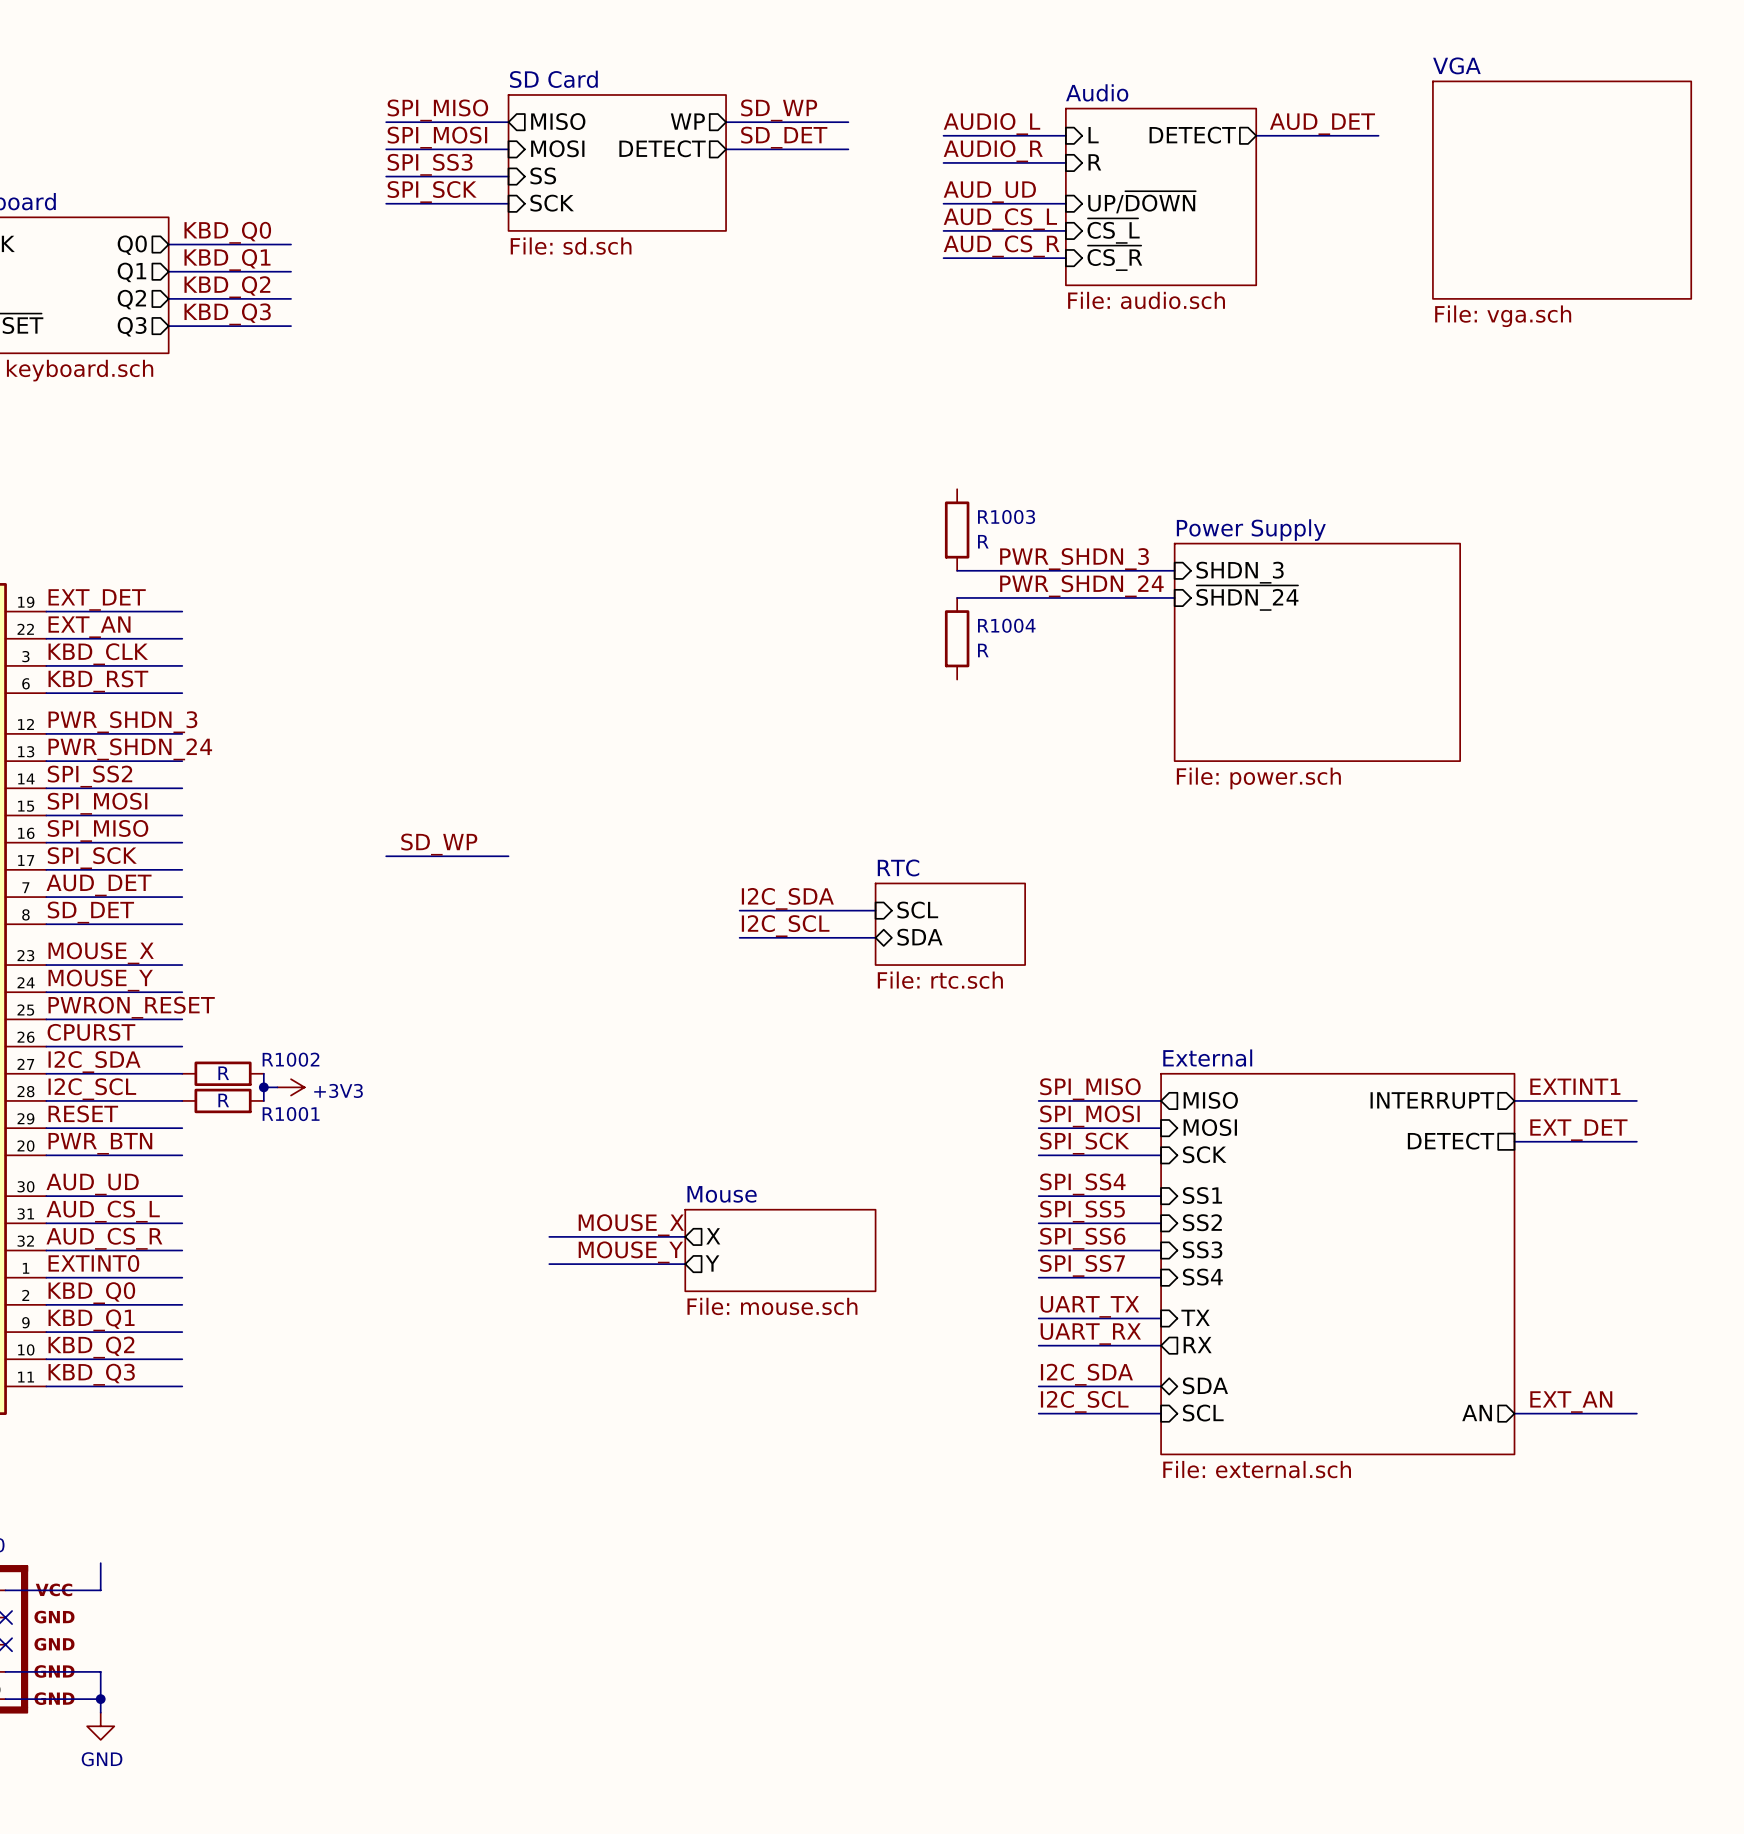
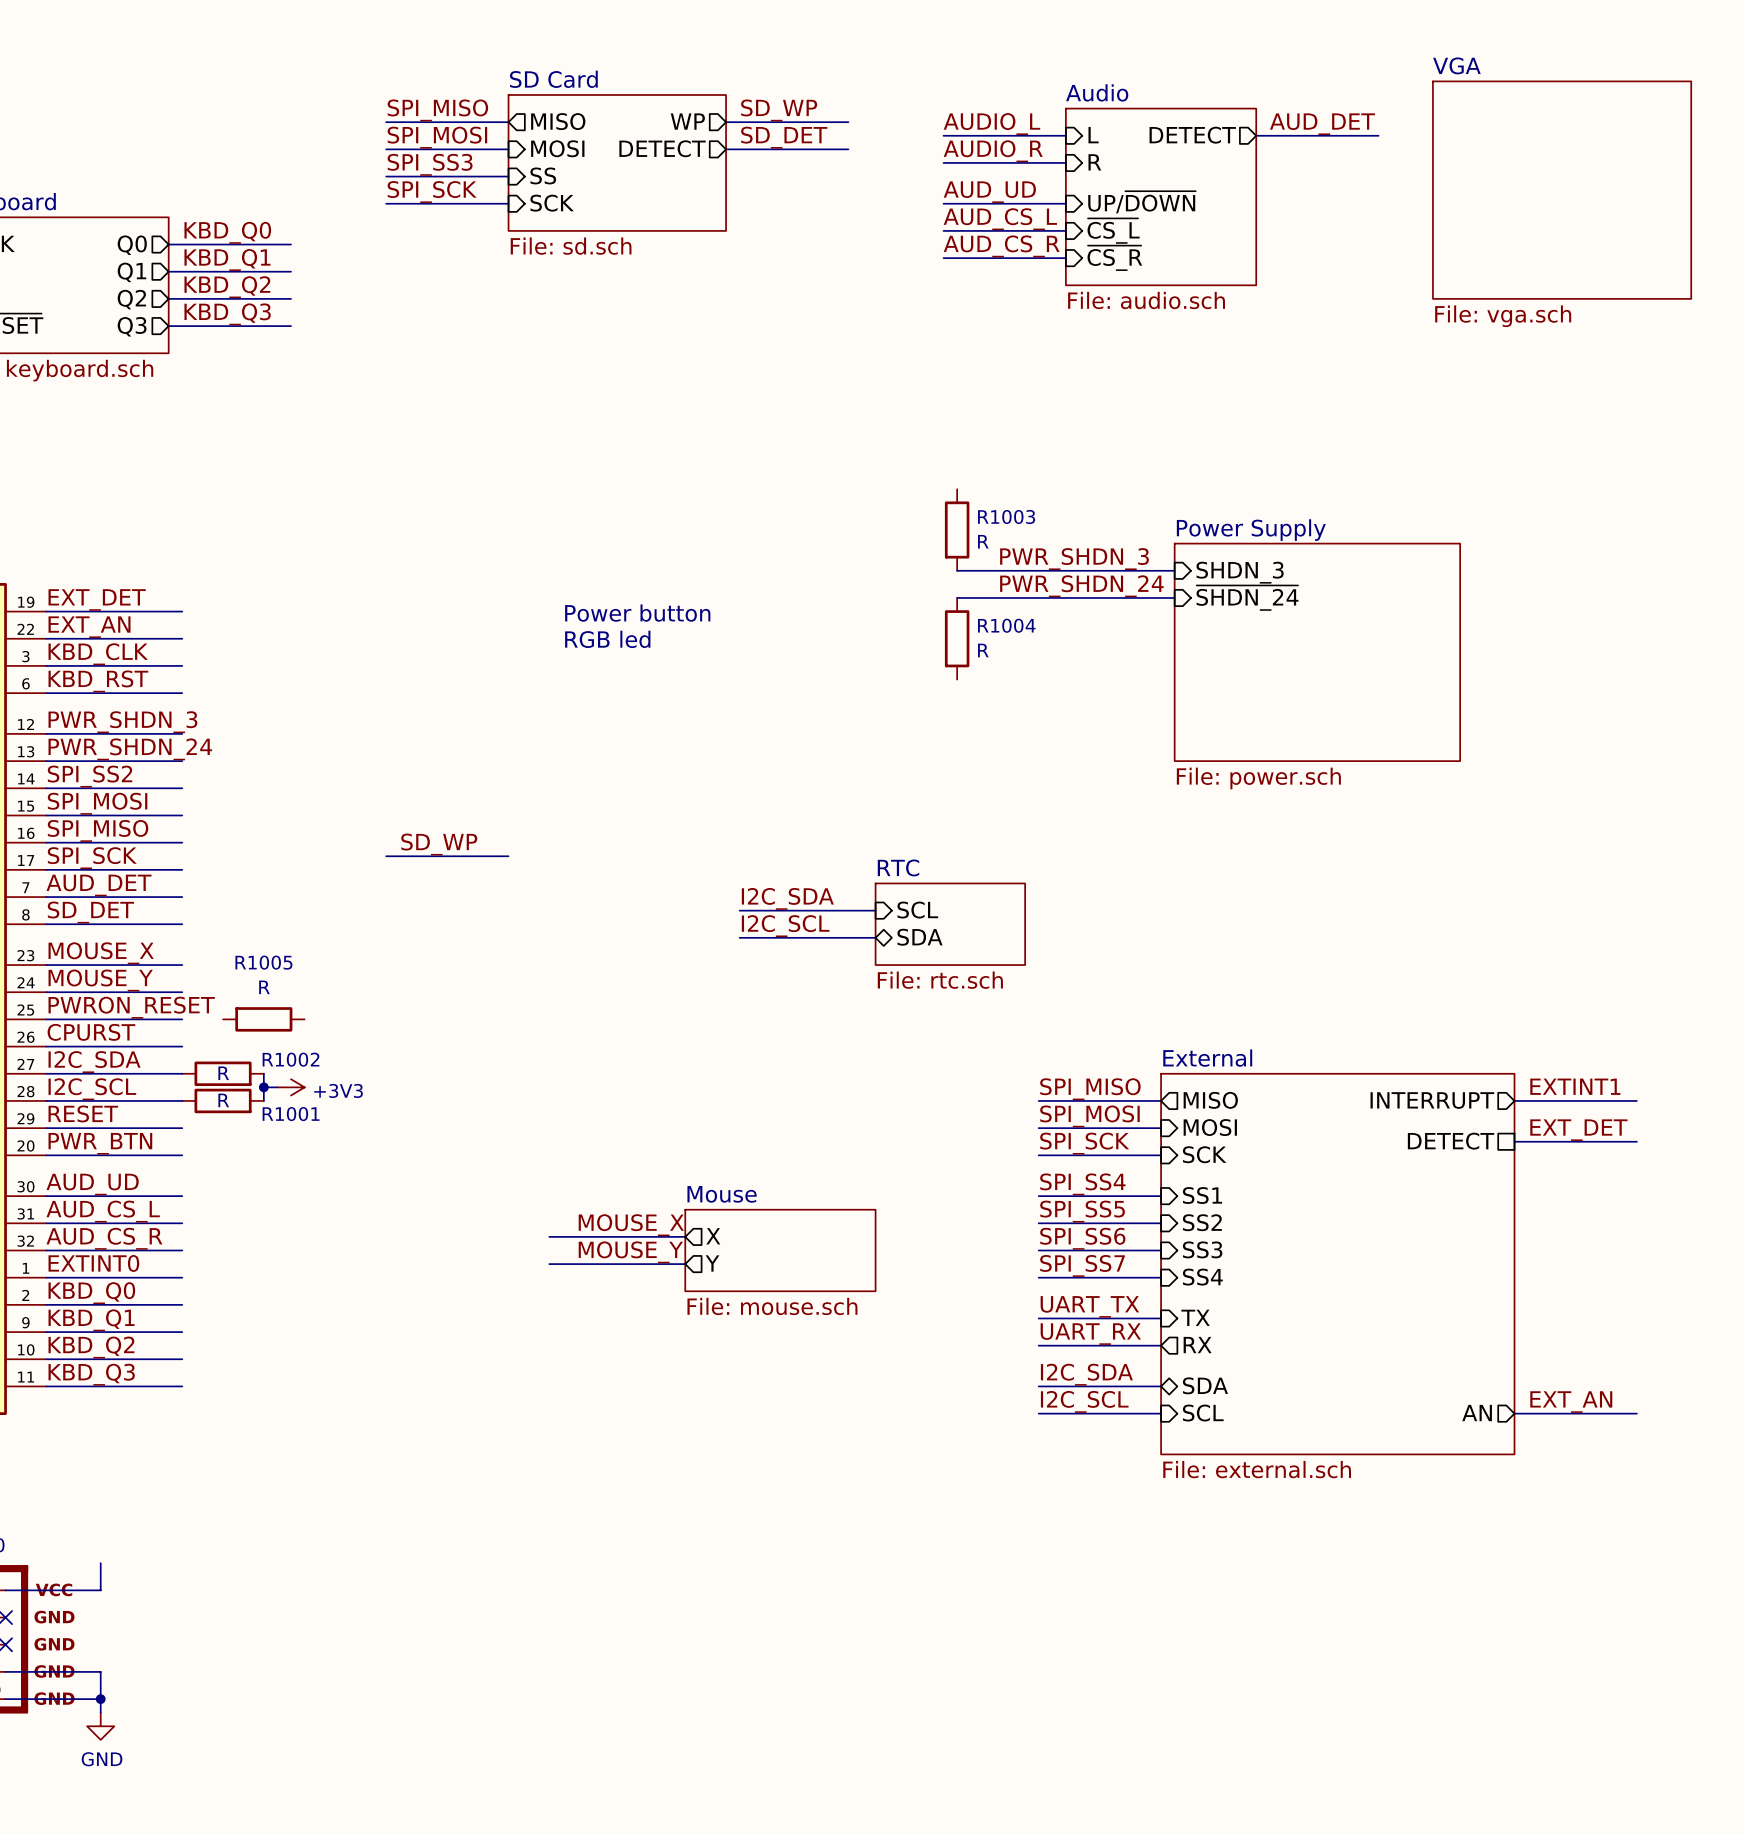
text: none -> Power button (637, 613)
text: none -> RGB led (607, 639)
R1005: none -> R (263, 1019)

